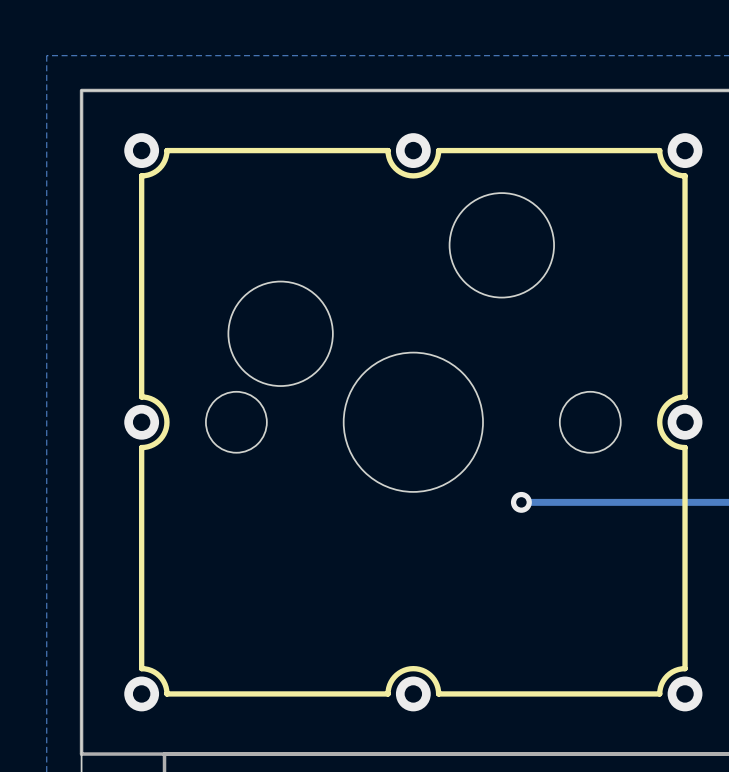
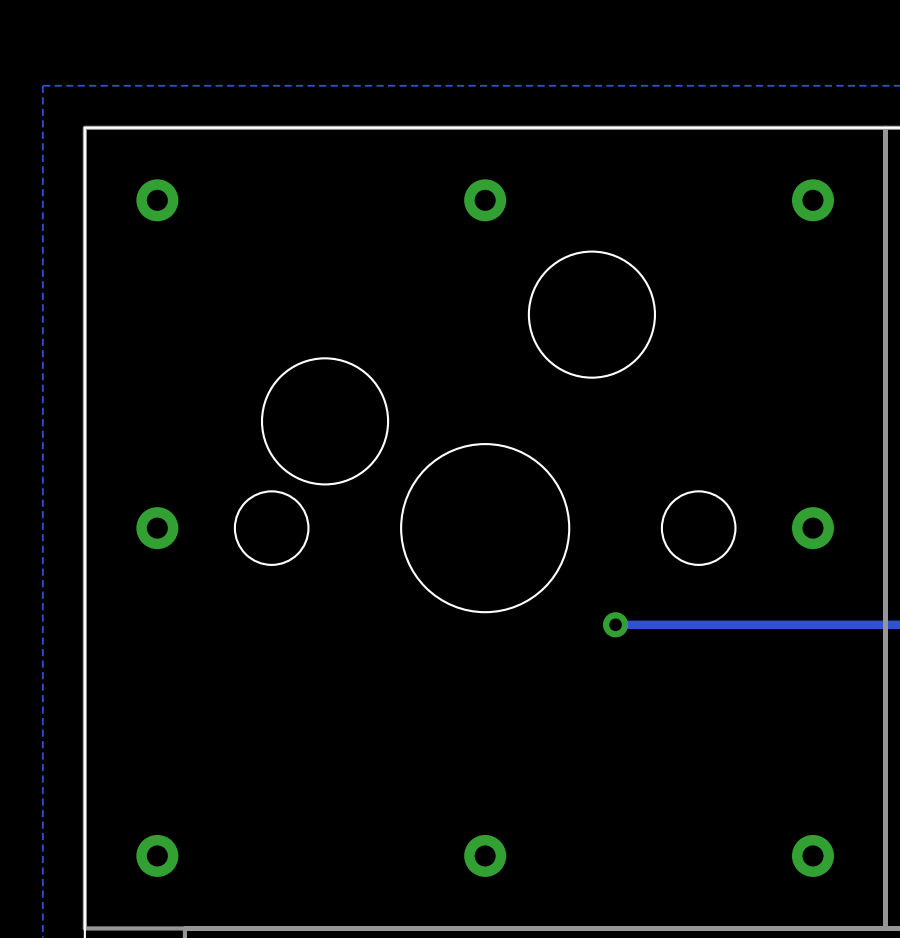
line: (659, 150) (438, 150) (436, 160) (431, 168) (423, 173) (413, 175) (403, 173) (395, 168) (389, 160) (388, 150) (166, 150) (165, 160) (159, 168) (151, 173) (141, 175) (141, 396) (153, 399) (160, 405) (165, 413) (166, 422) (164, 434) (158, 441) (150, 445) (141, 447) (141, 668) (151, 670) (159, 676) (165, 684) (166, 693) (388, 693) (389, 684) (394, 677) (401, 671) (413, 668) (425, 671) (432, 677) (437, 684) (438, 693) (659, 693) (661, 684) (667, 676) (675, 670) (685, 668) (685, 447) (676, 445) (668, 441) (662, 434) (659, 422) (661, 413) (666, 405) (676, 398) (685, 396) (685, 175) (675, 173) (667, 168) (661, 160) (659, 150) -> none

